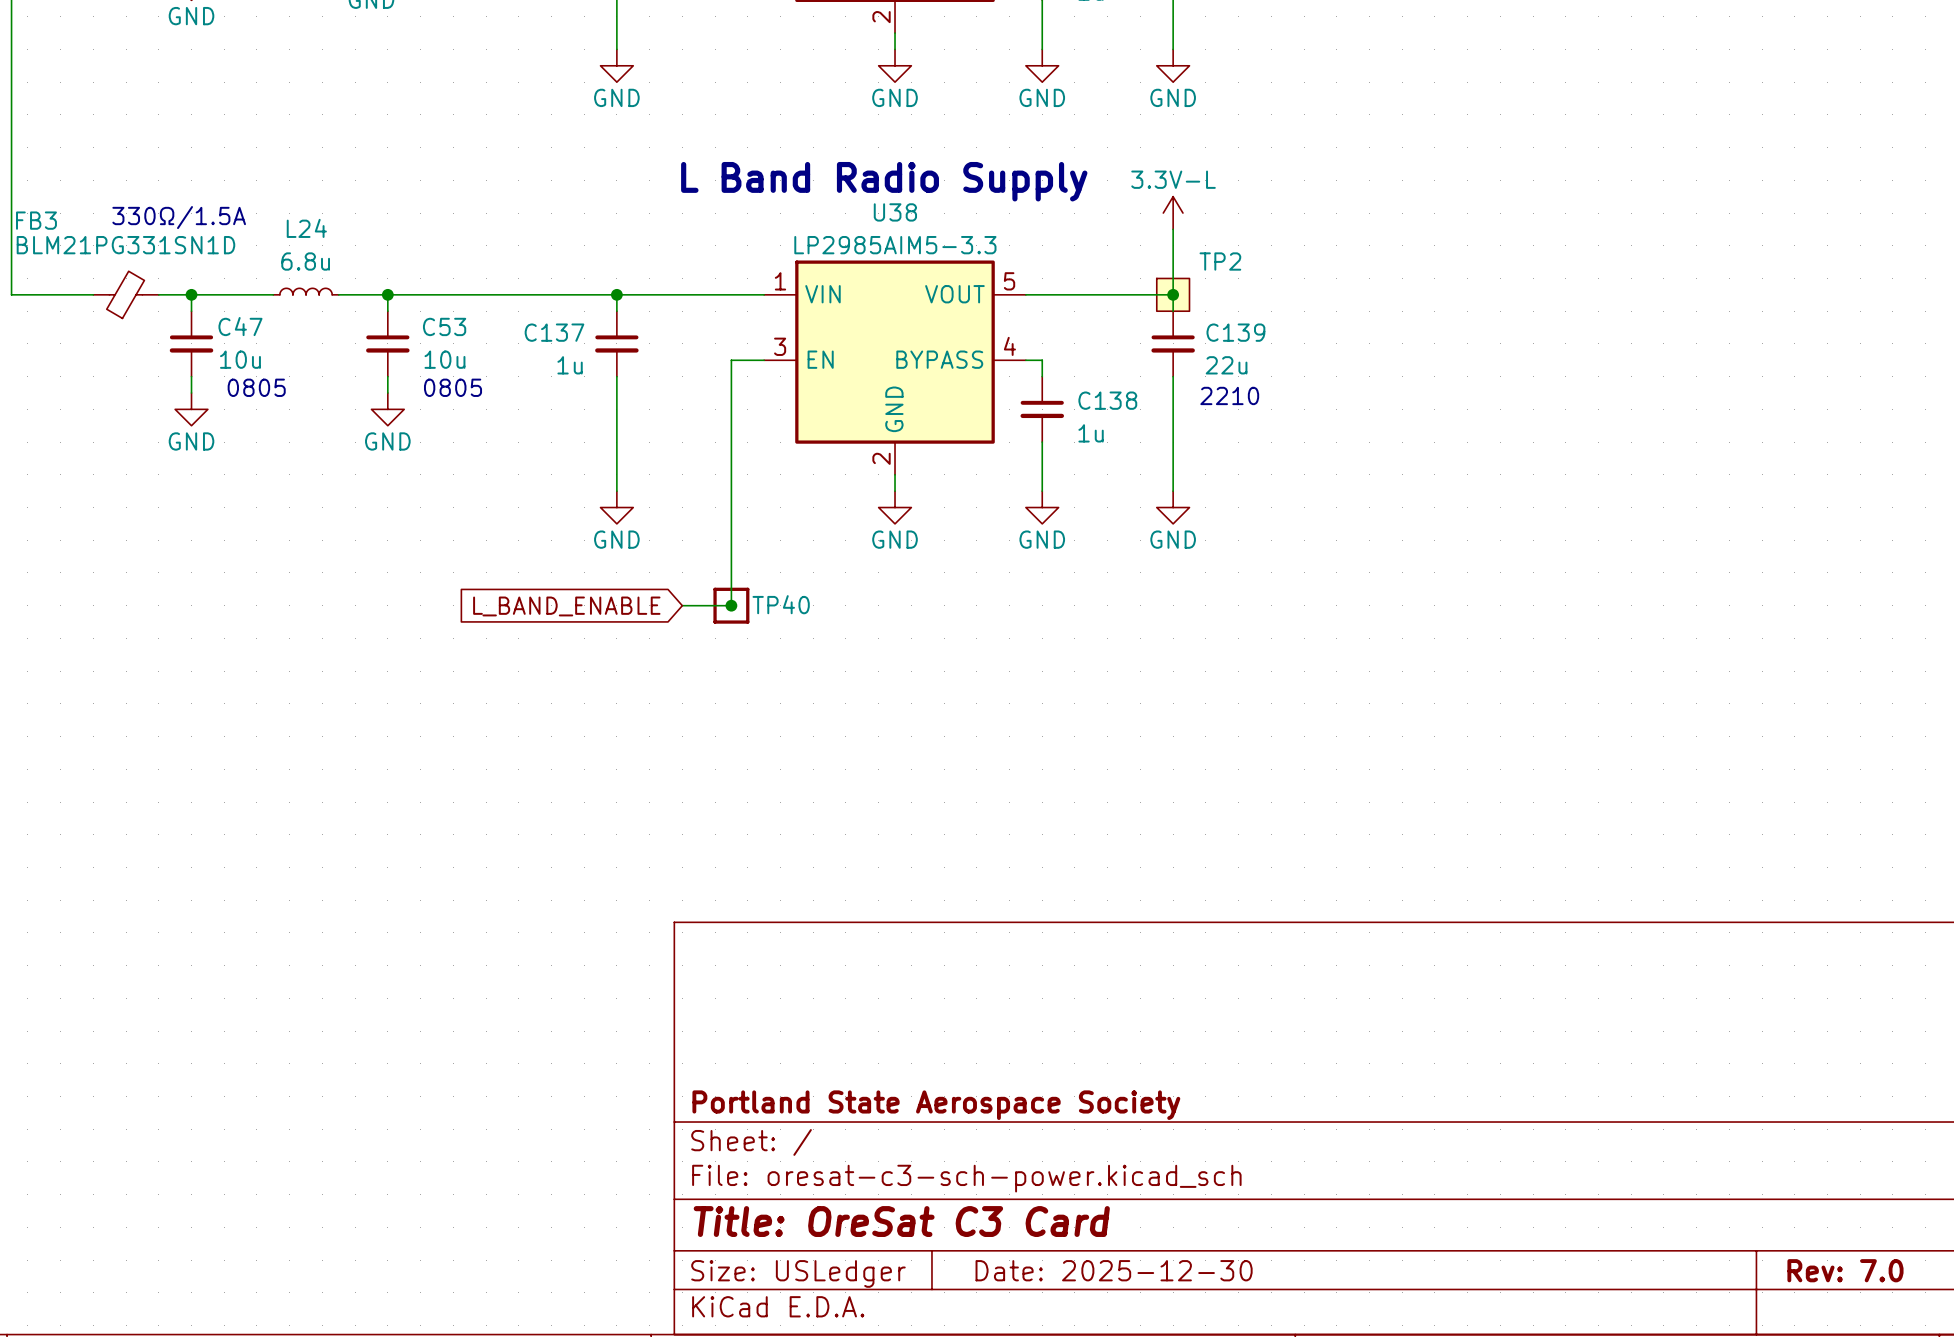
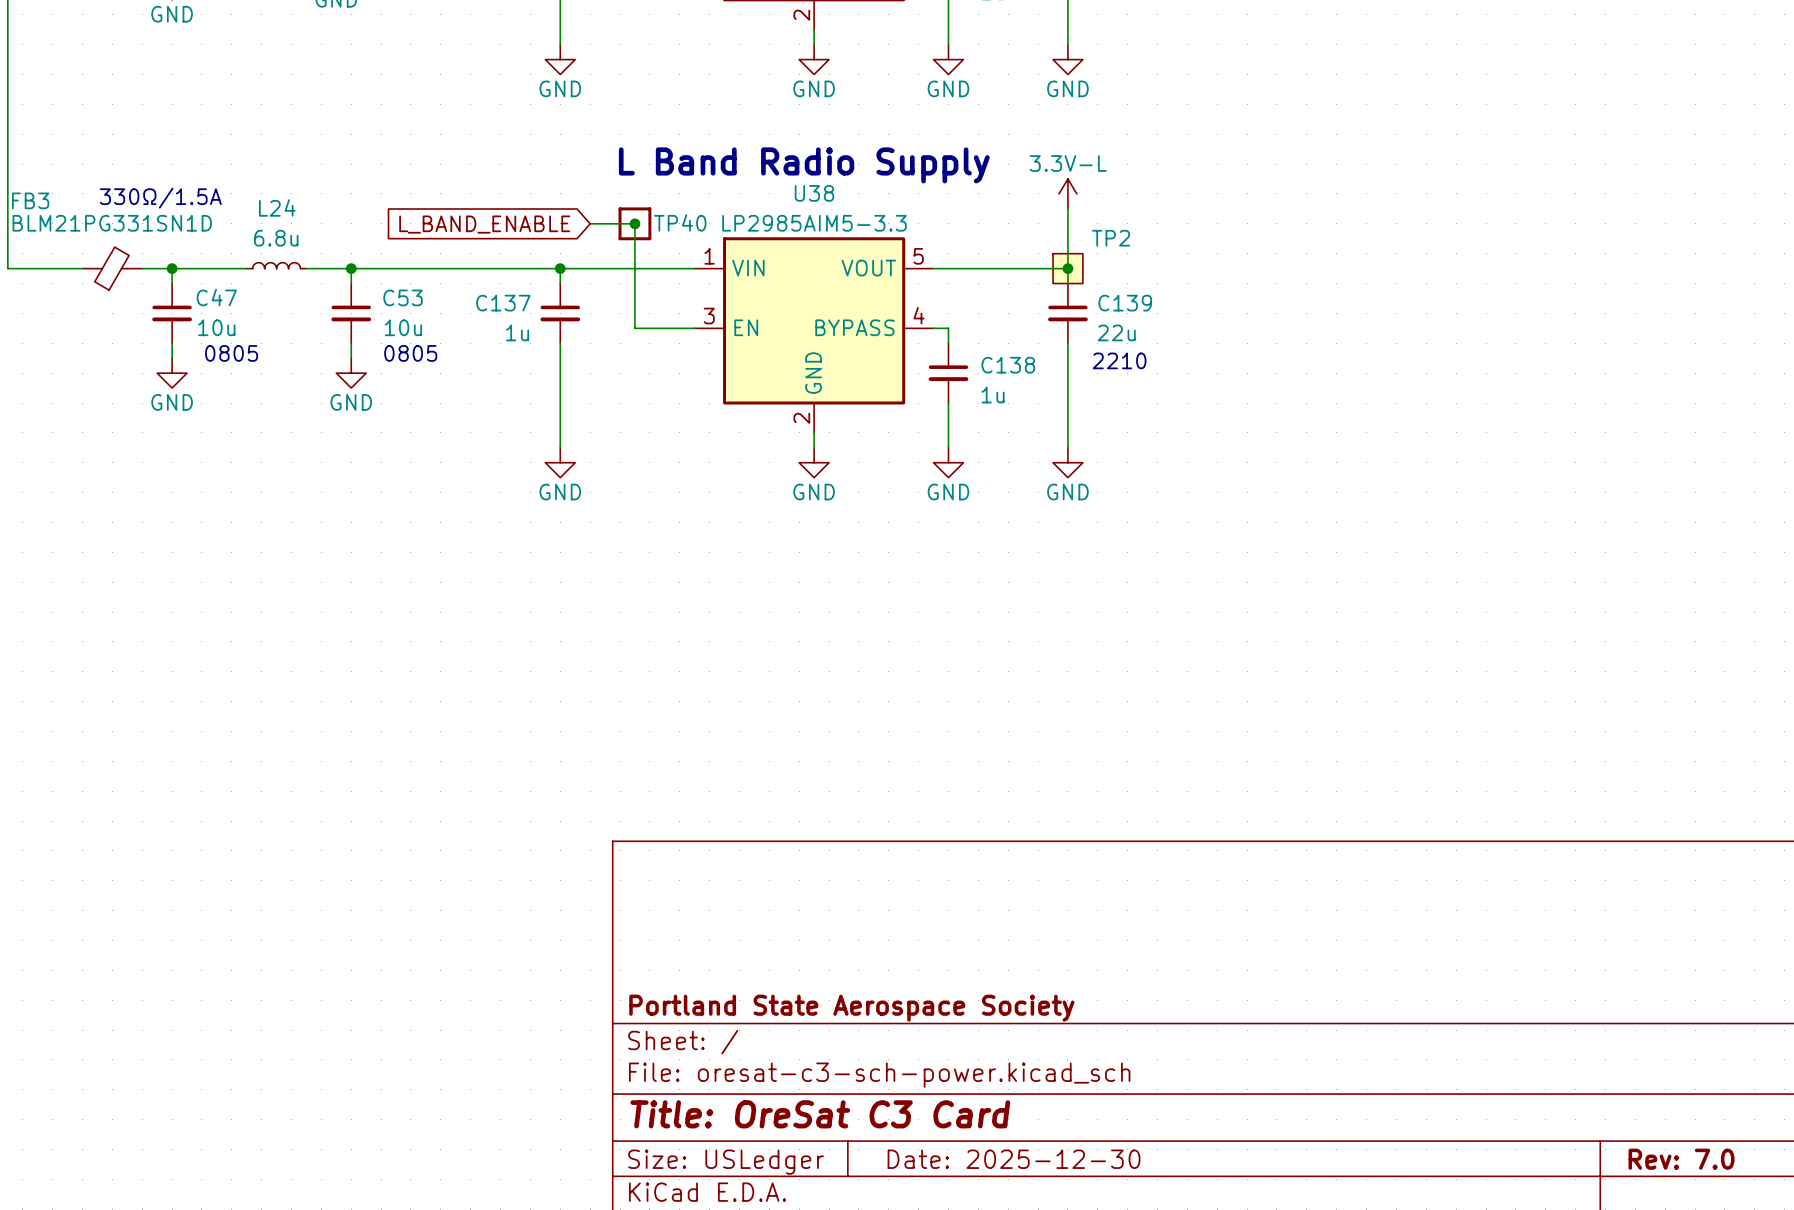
junction: none -> (634, 223)
global label: none -> L_BAND_ENABLE (484, 224)
wire: (731, 360) (731, 605) (682, 605) -> (664, 328) (634, 328) (634, 223) (590, 223)
junction: (731, 605) -> none
TP40 position: (731, 605) -> (634, 223)
global label: L_BAND_ENABLE (566, 606) -> none

